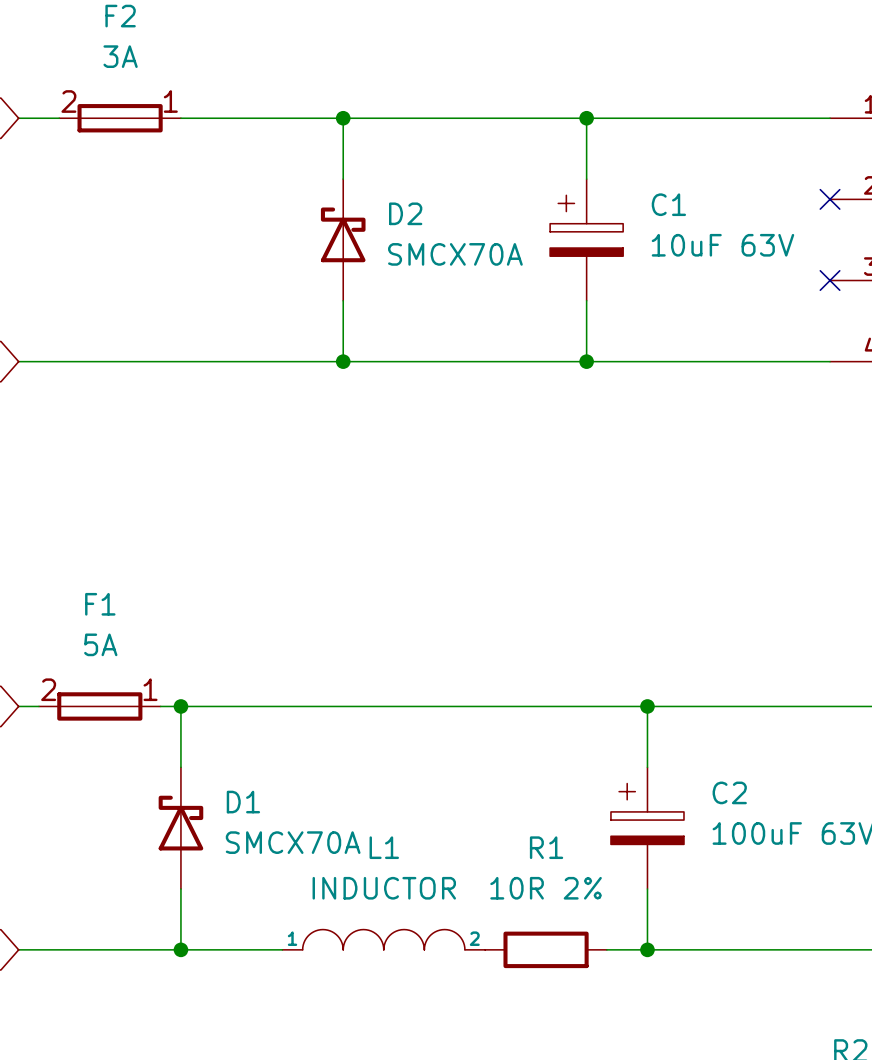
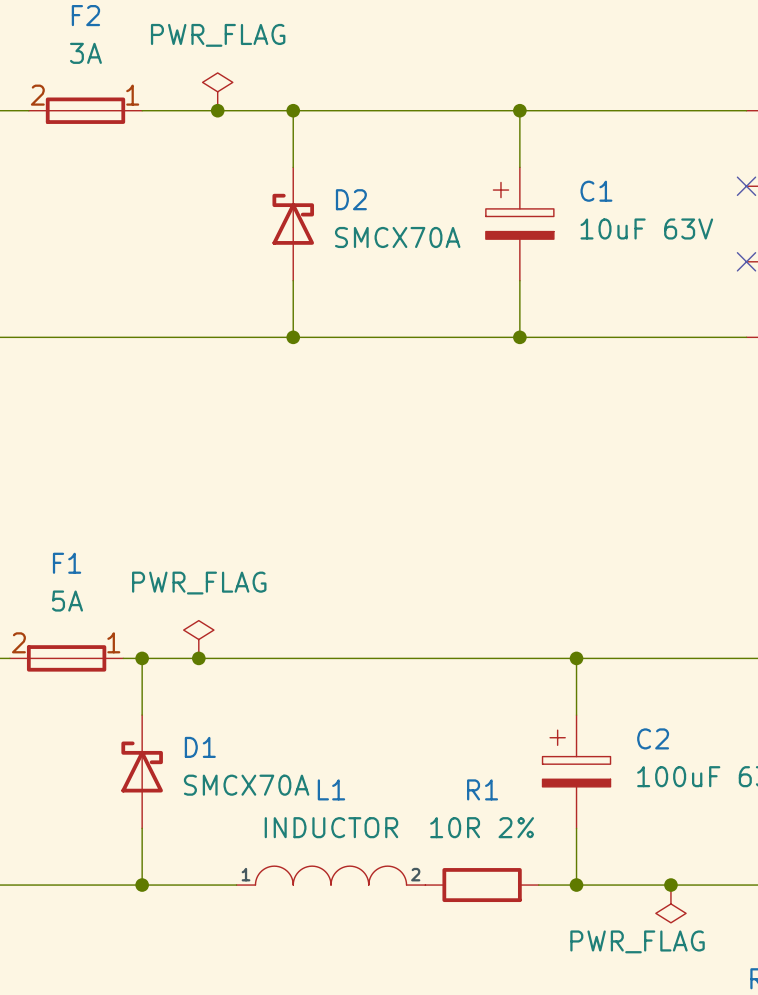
power symbol: none -> PWR_FLAG (217, 91)
junction: none -> (217, 110)
power symbol: none -> PWR_FLAG (198, 639)
junction: none -> (198, 658)
junction: none -> (670, 885)
power symbol: none -> PWR_FLAG (670, 903)

